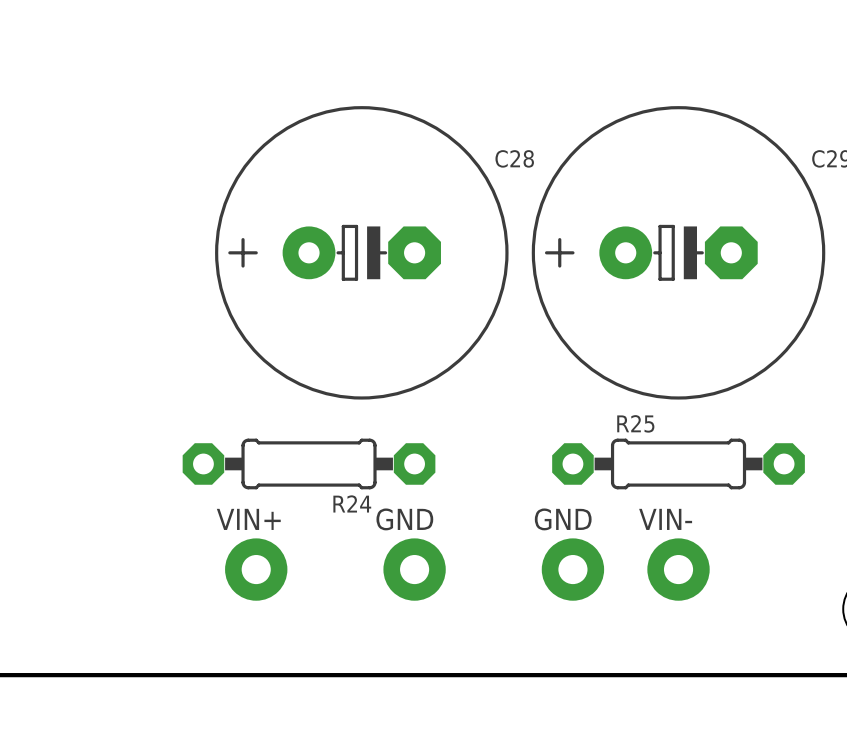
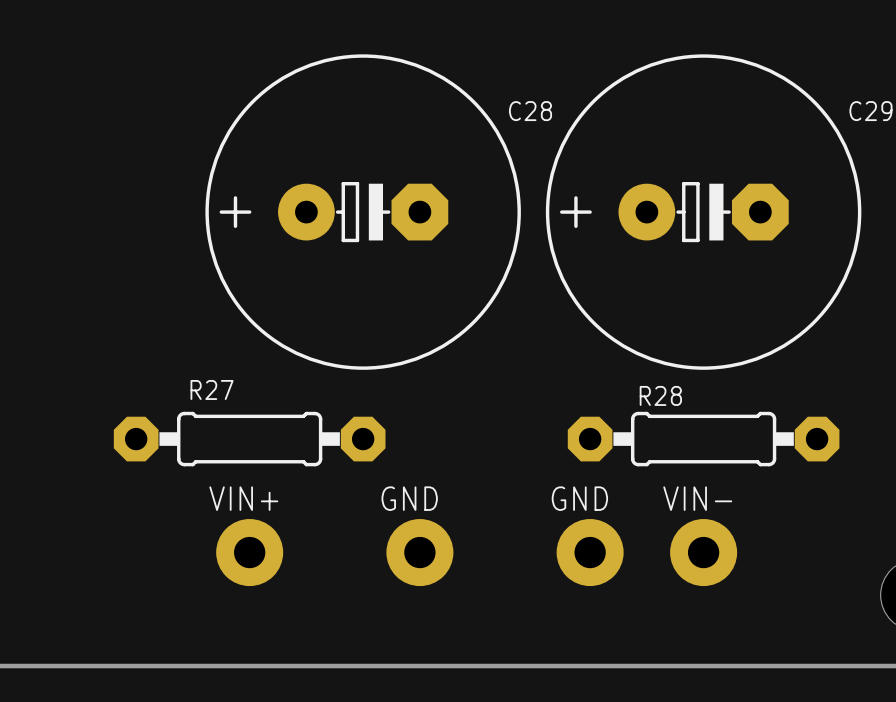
R25 name: R25 (635, 423) -> R28 (660, 395)
R27: none -> (249, 439)
R24: (309, 463) -> none

